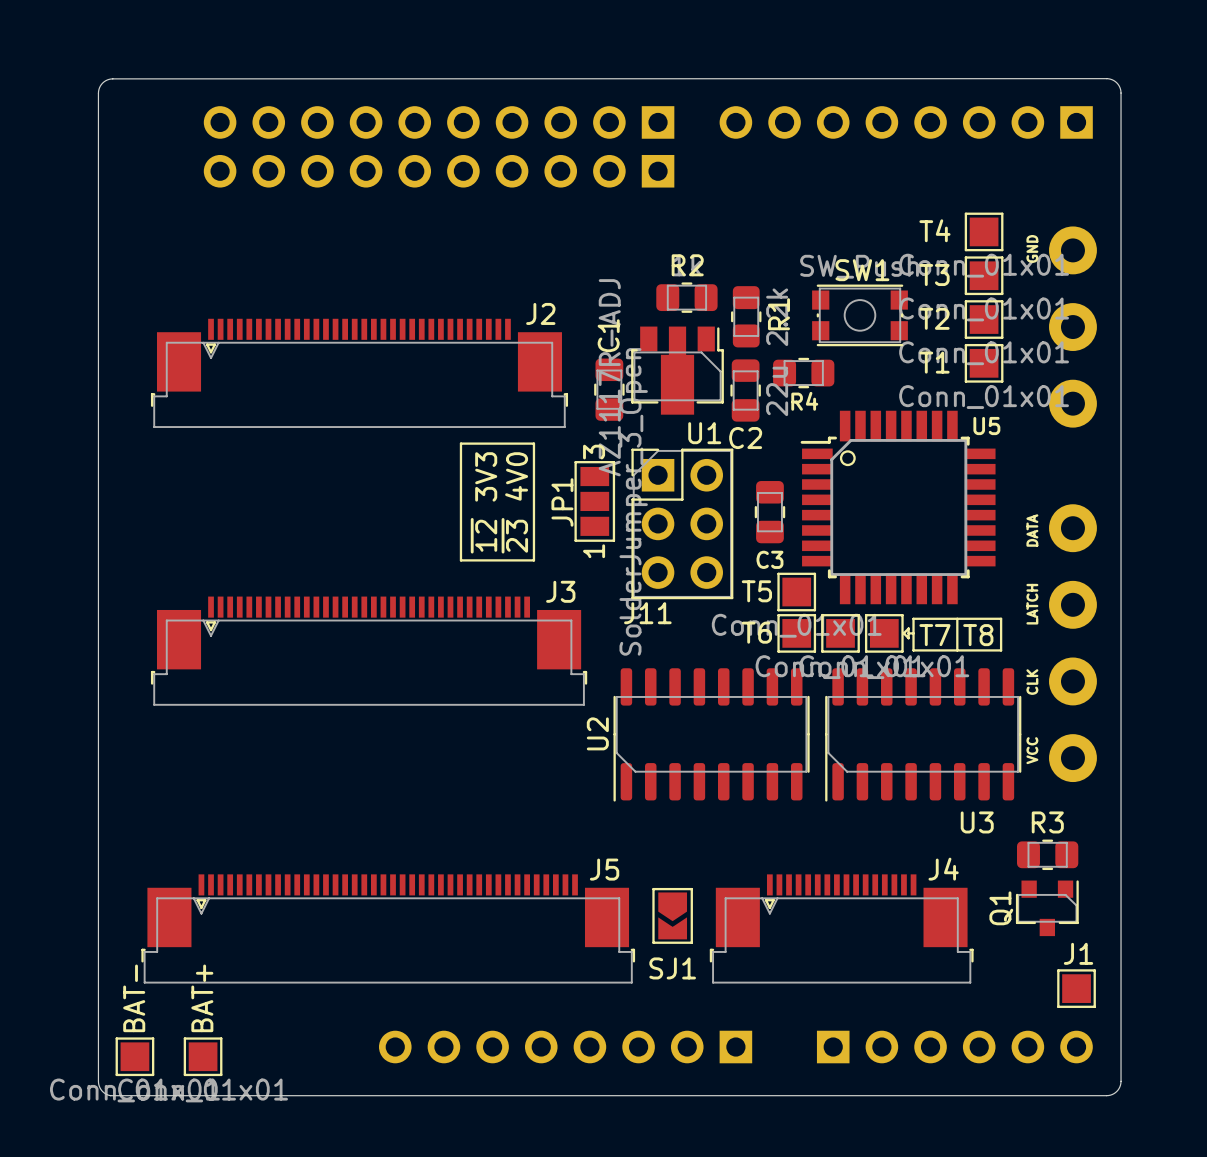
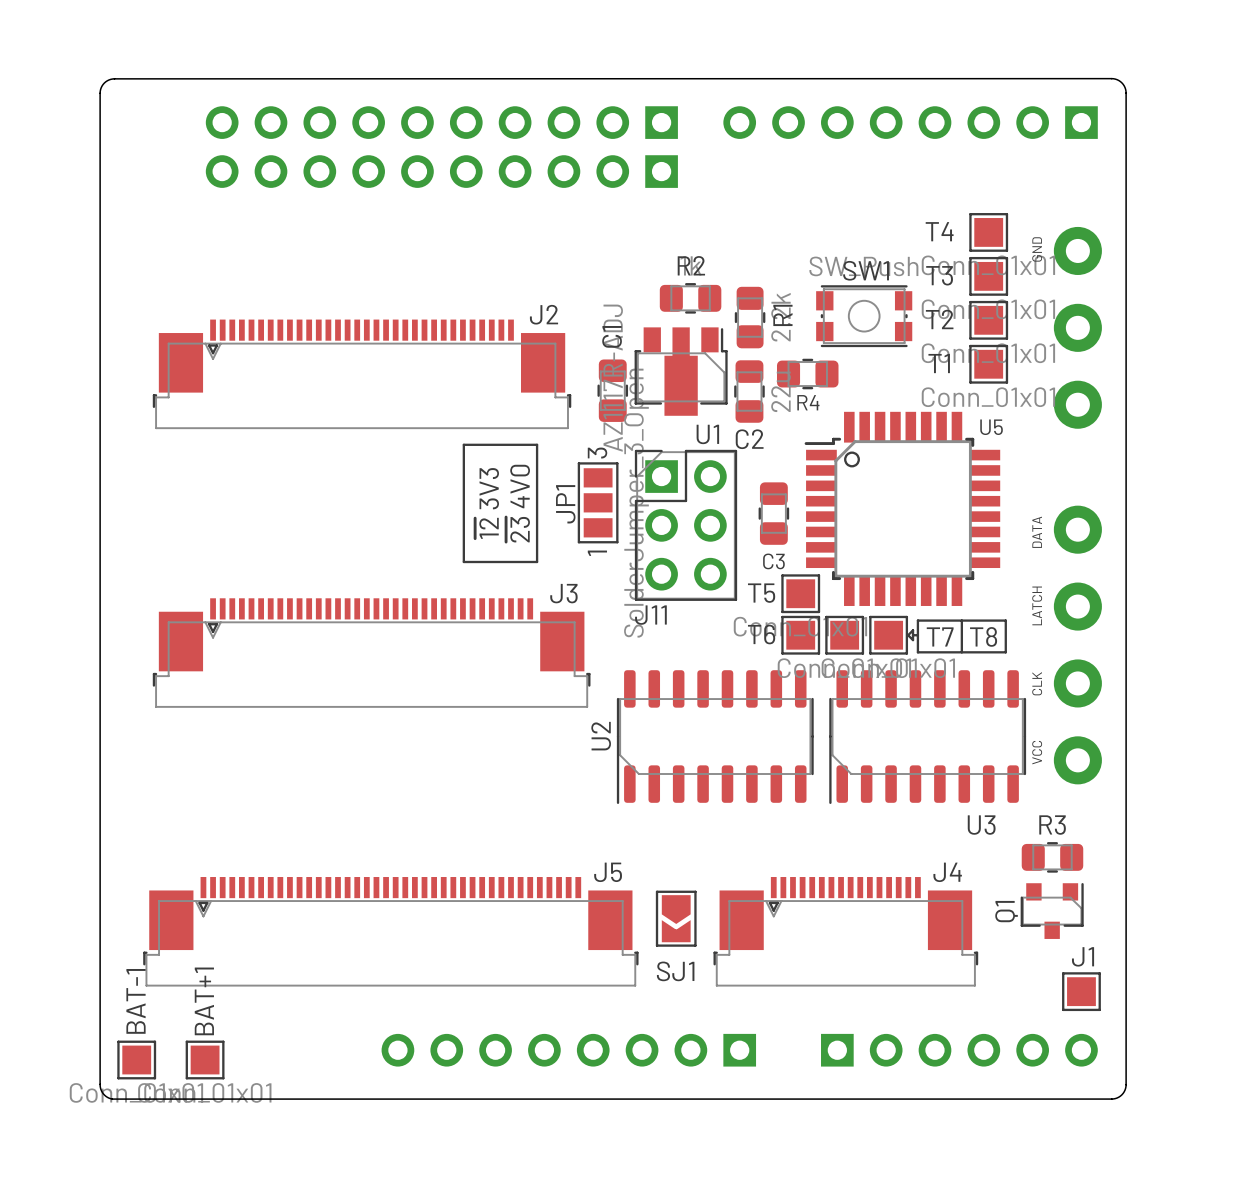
BAT- name: BAT- (134, 998) -> BAT-1 (136, 1001)
BAT+ name: BAT+ (202, 998) -> BAT+1 (204, 1001)

